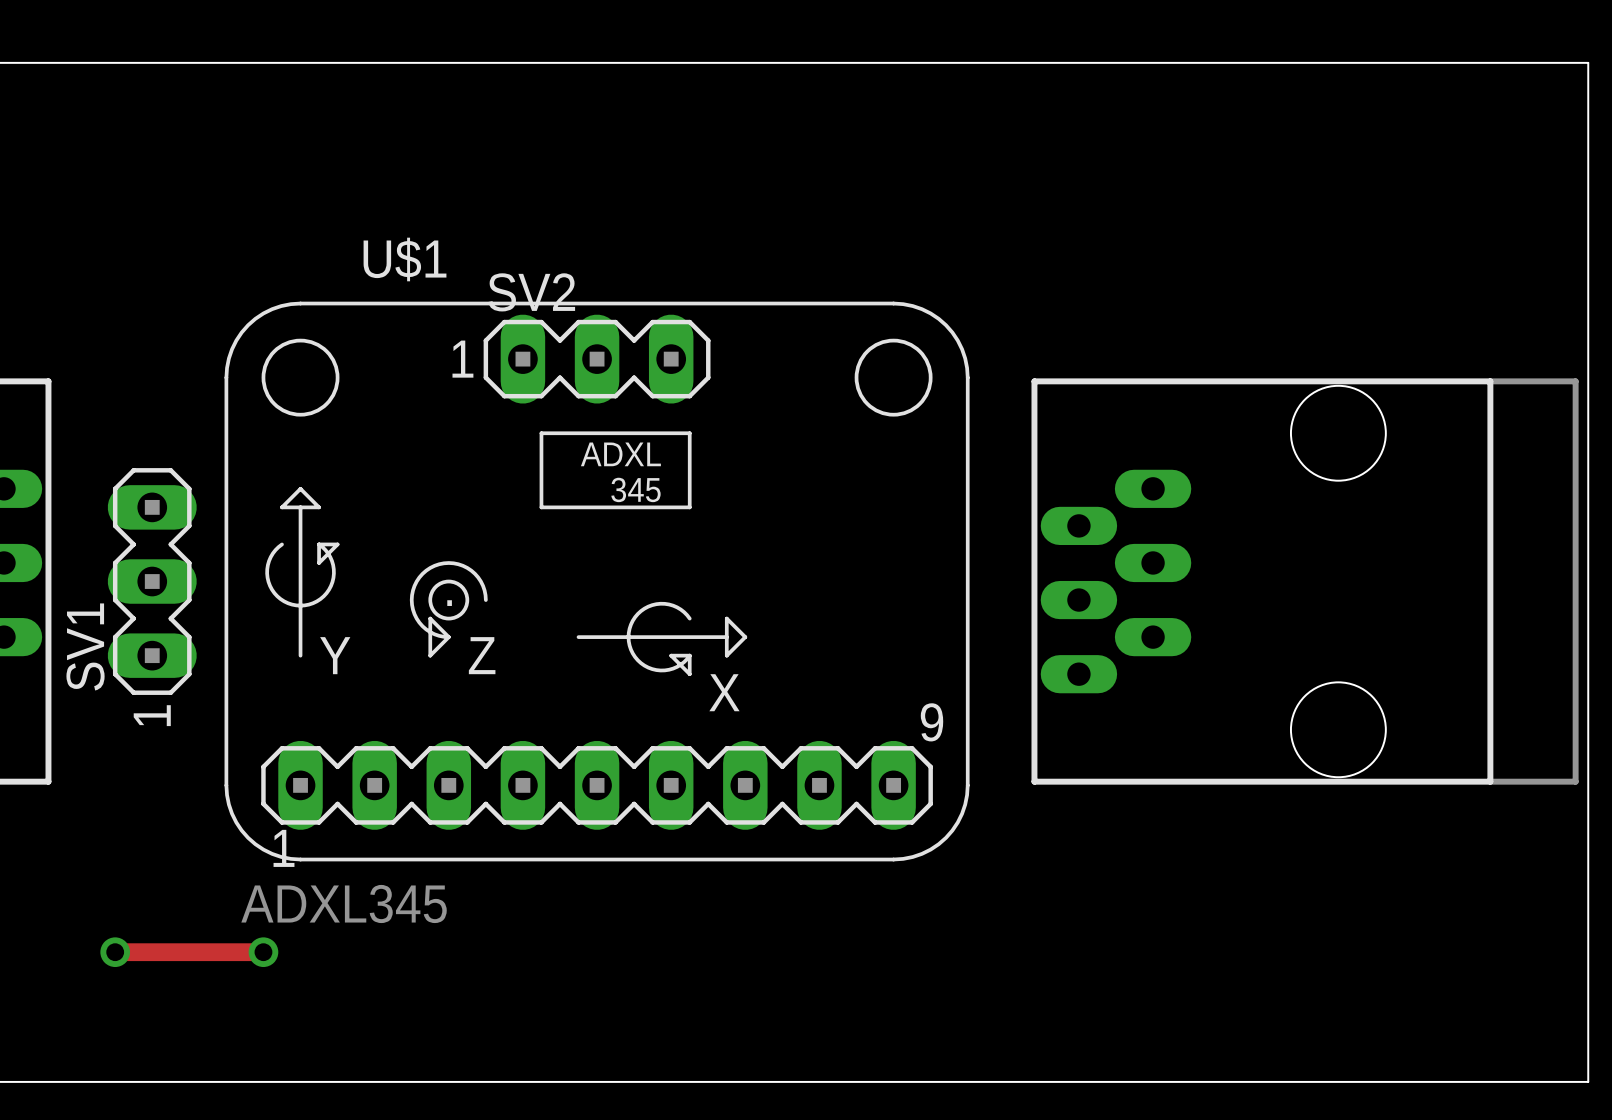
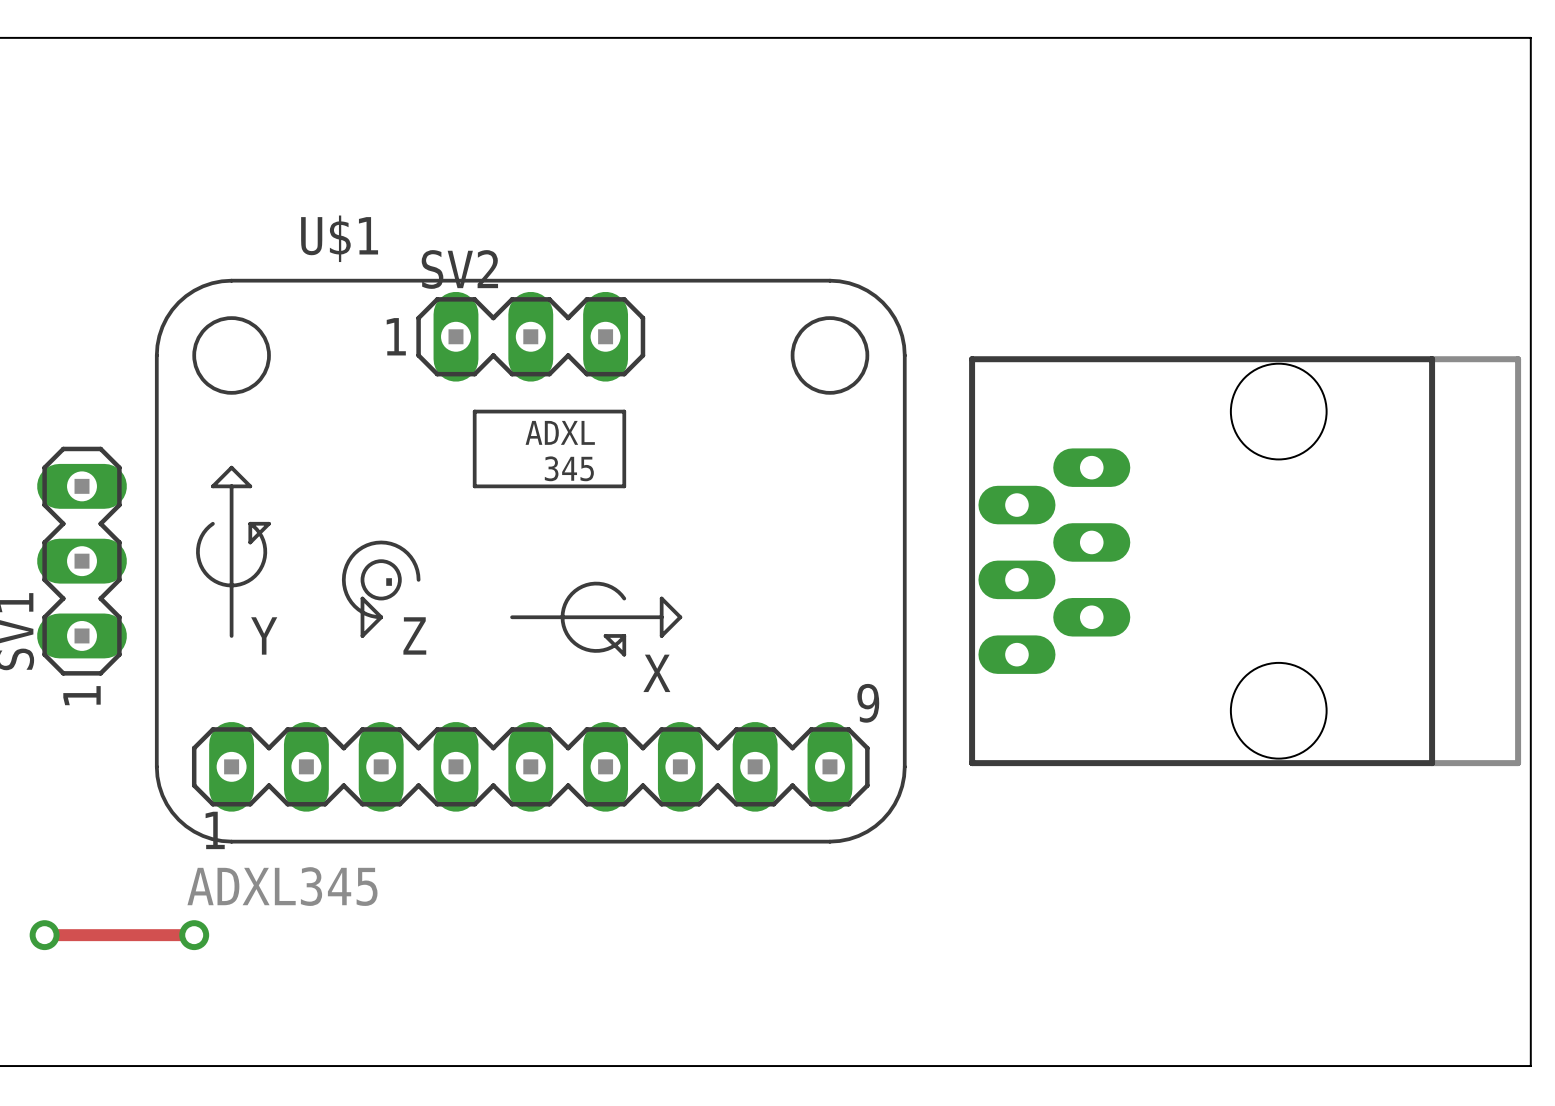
track width: thick (115, 952) (263, 952) -> thin (44, 935) (194, 935)

